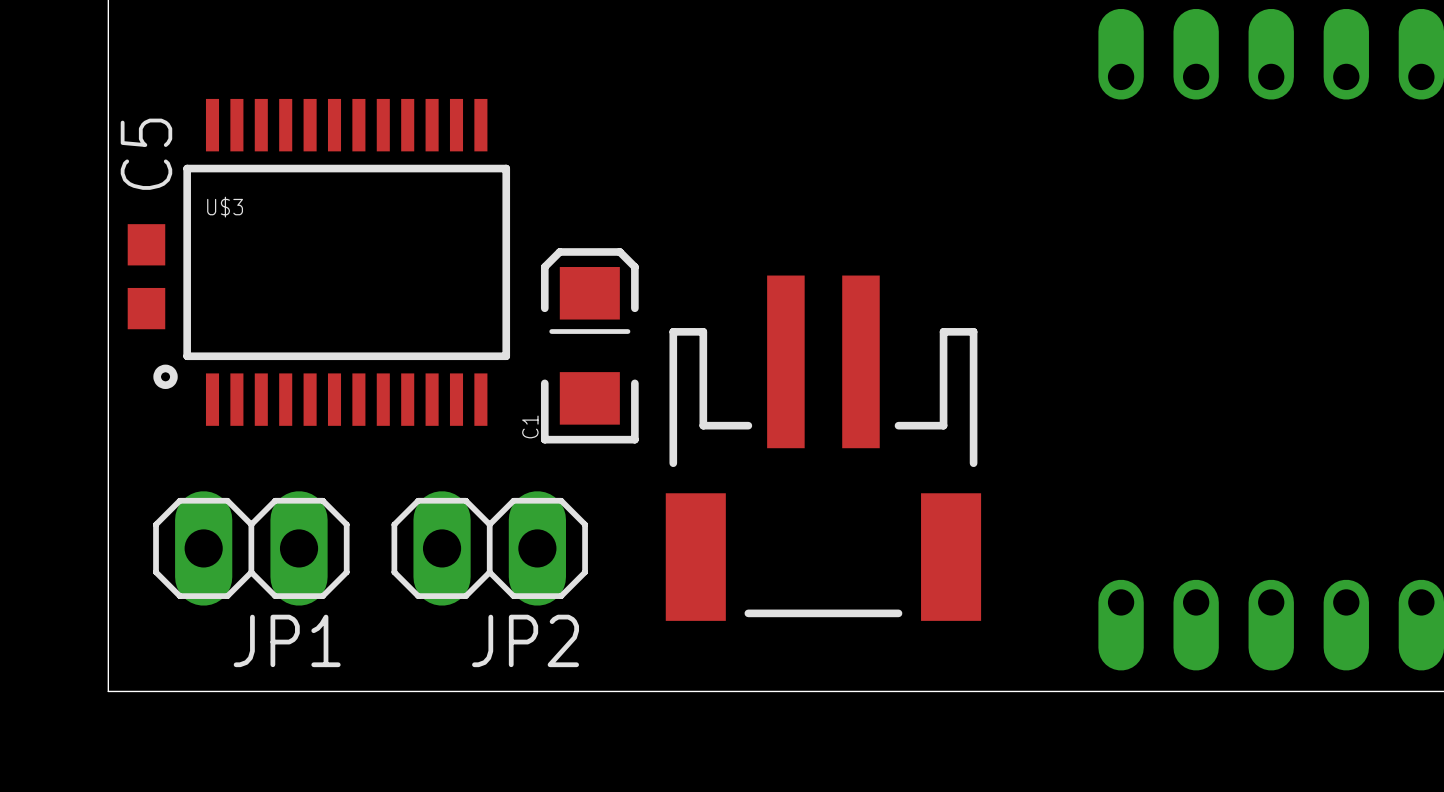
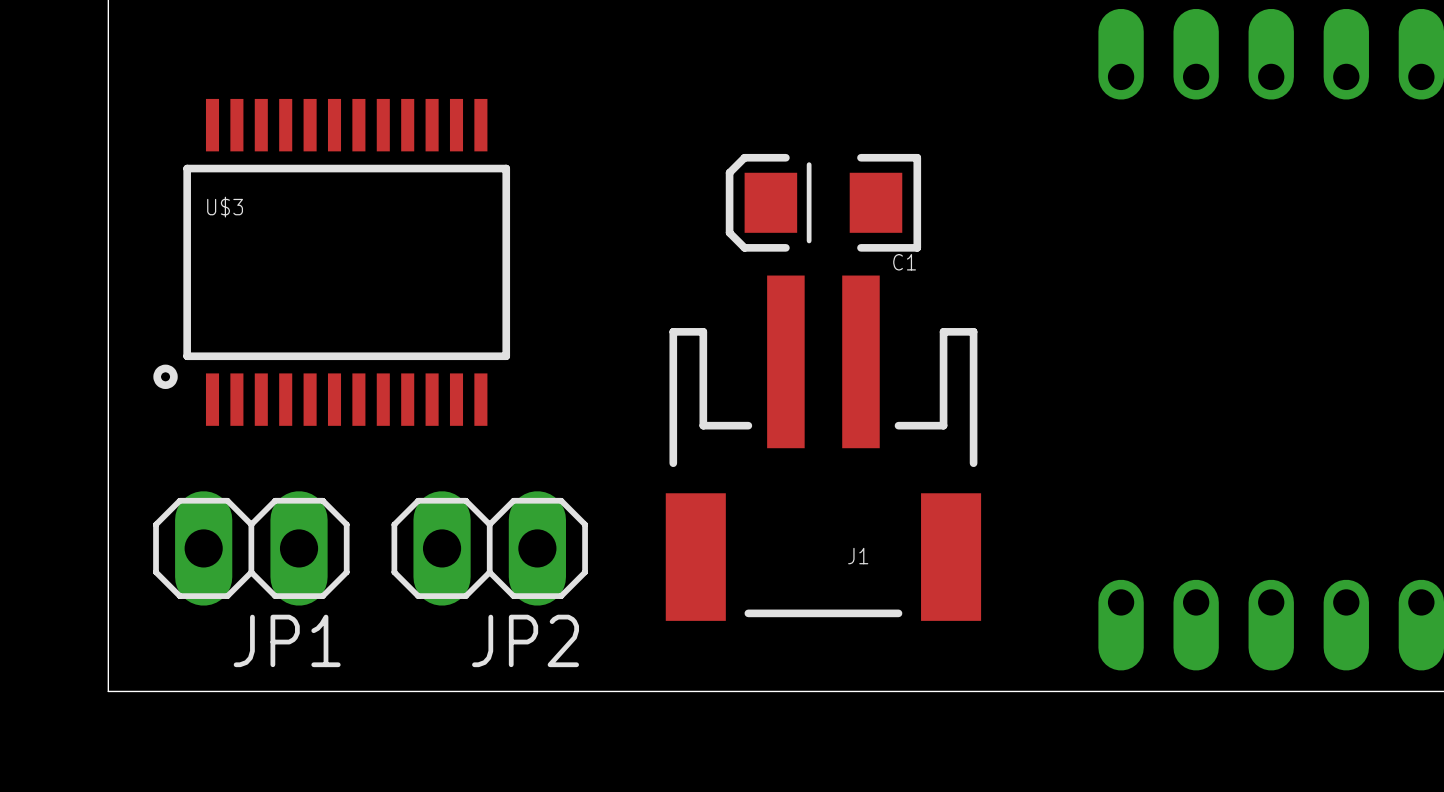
C5: (146, 276) -> none
C1 rotation: 0° (589, 345) -> 90° counterclockwise (823, 202)
C1 position: (589, 345) -> (823, 202)
J1 name: none -> J1 (858, 556)

